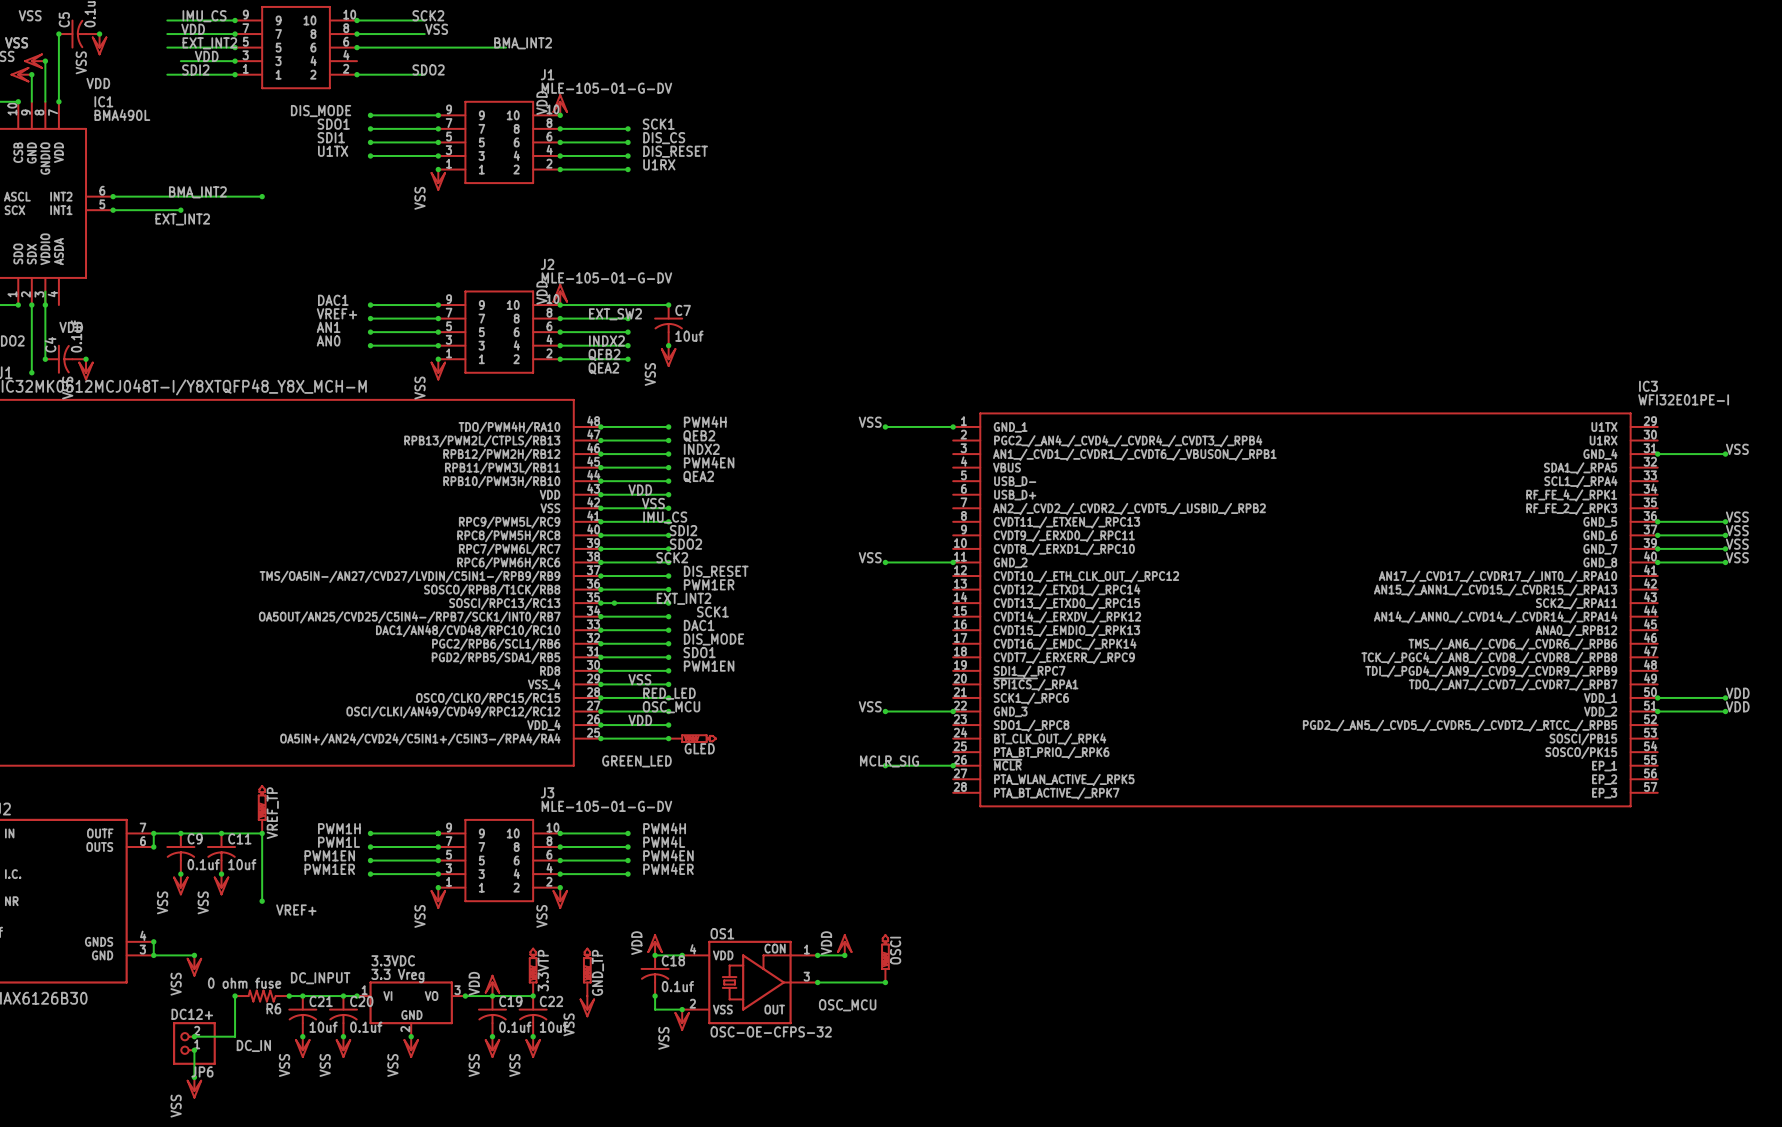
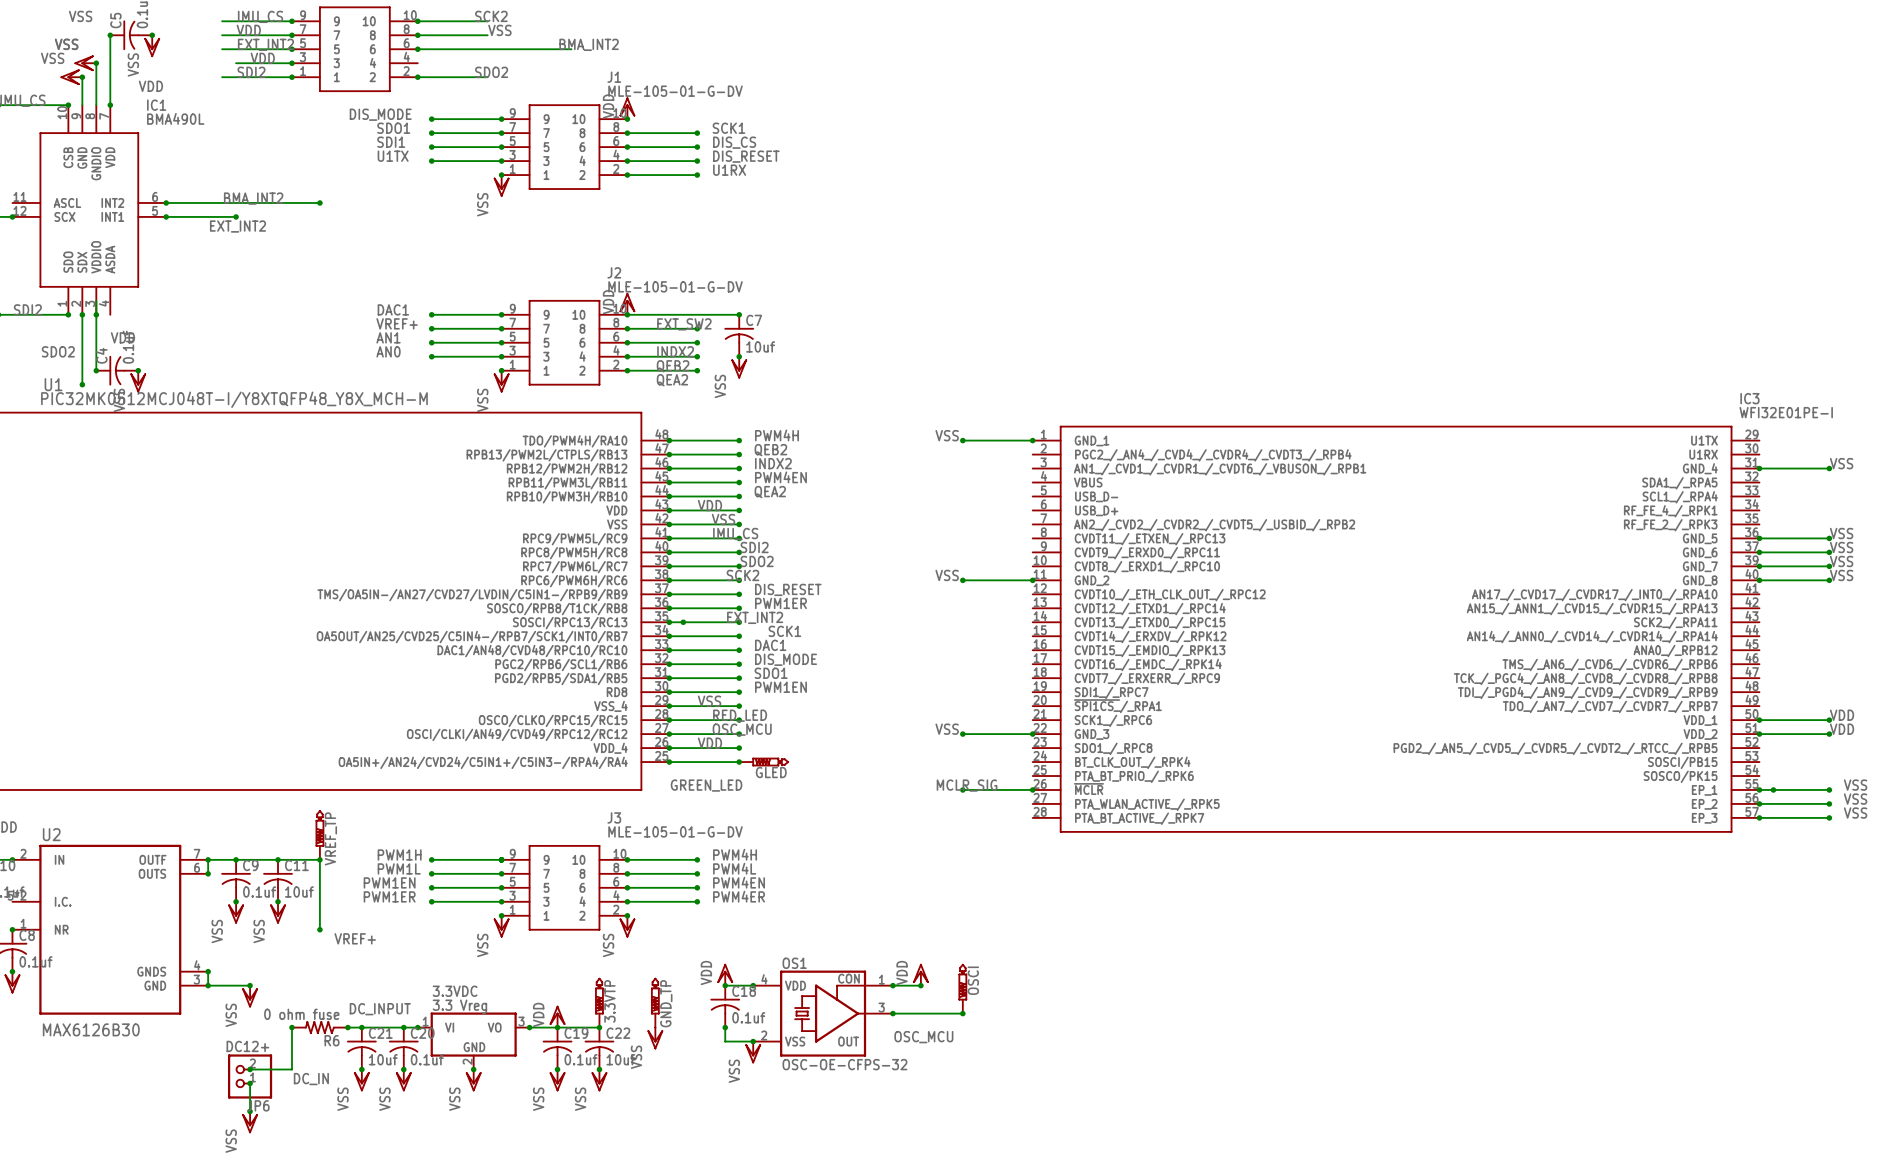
label: none -> VSS (1855, 785)
wire: none -> (1759, 789) (1829, 789)
junction: none -> (1759, 789)
junction: none -> (1773, 789)
junction: none -> (1829, 789)
label: none -> VSS (1855, 799)
wire: none -> (1759, 803) (1829, 803)
junction: none -> (1759, 803)
junction: none -> (1829, 803)
label: none -> VSS (1855, 813)
wire: none -> (1759, 817) (1829, 817)
junction: none -> (1759, 817)
junction: none -> (1829, 817)

